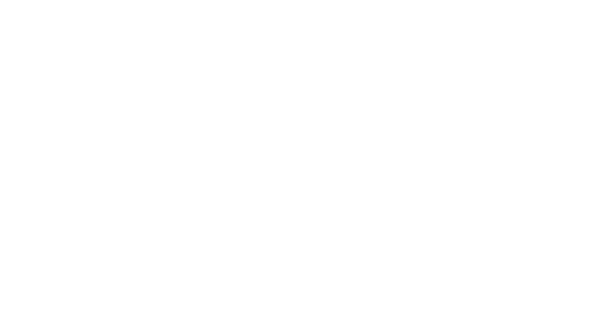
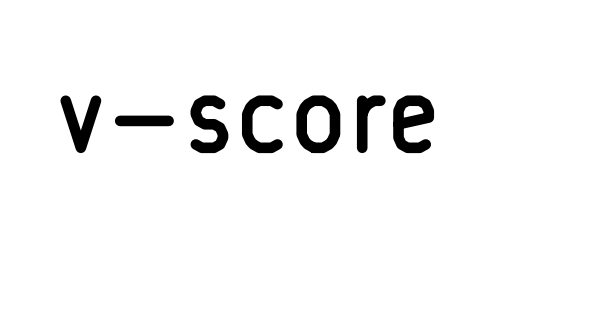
text: none -> v-score (247, 124)

